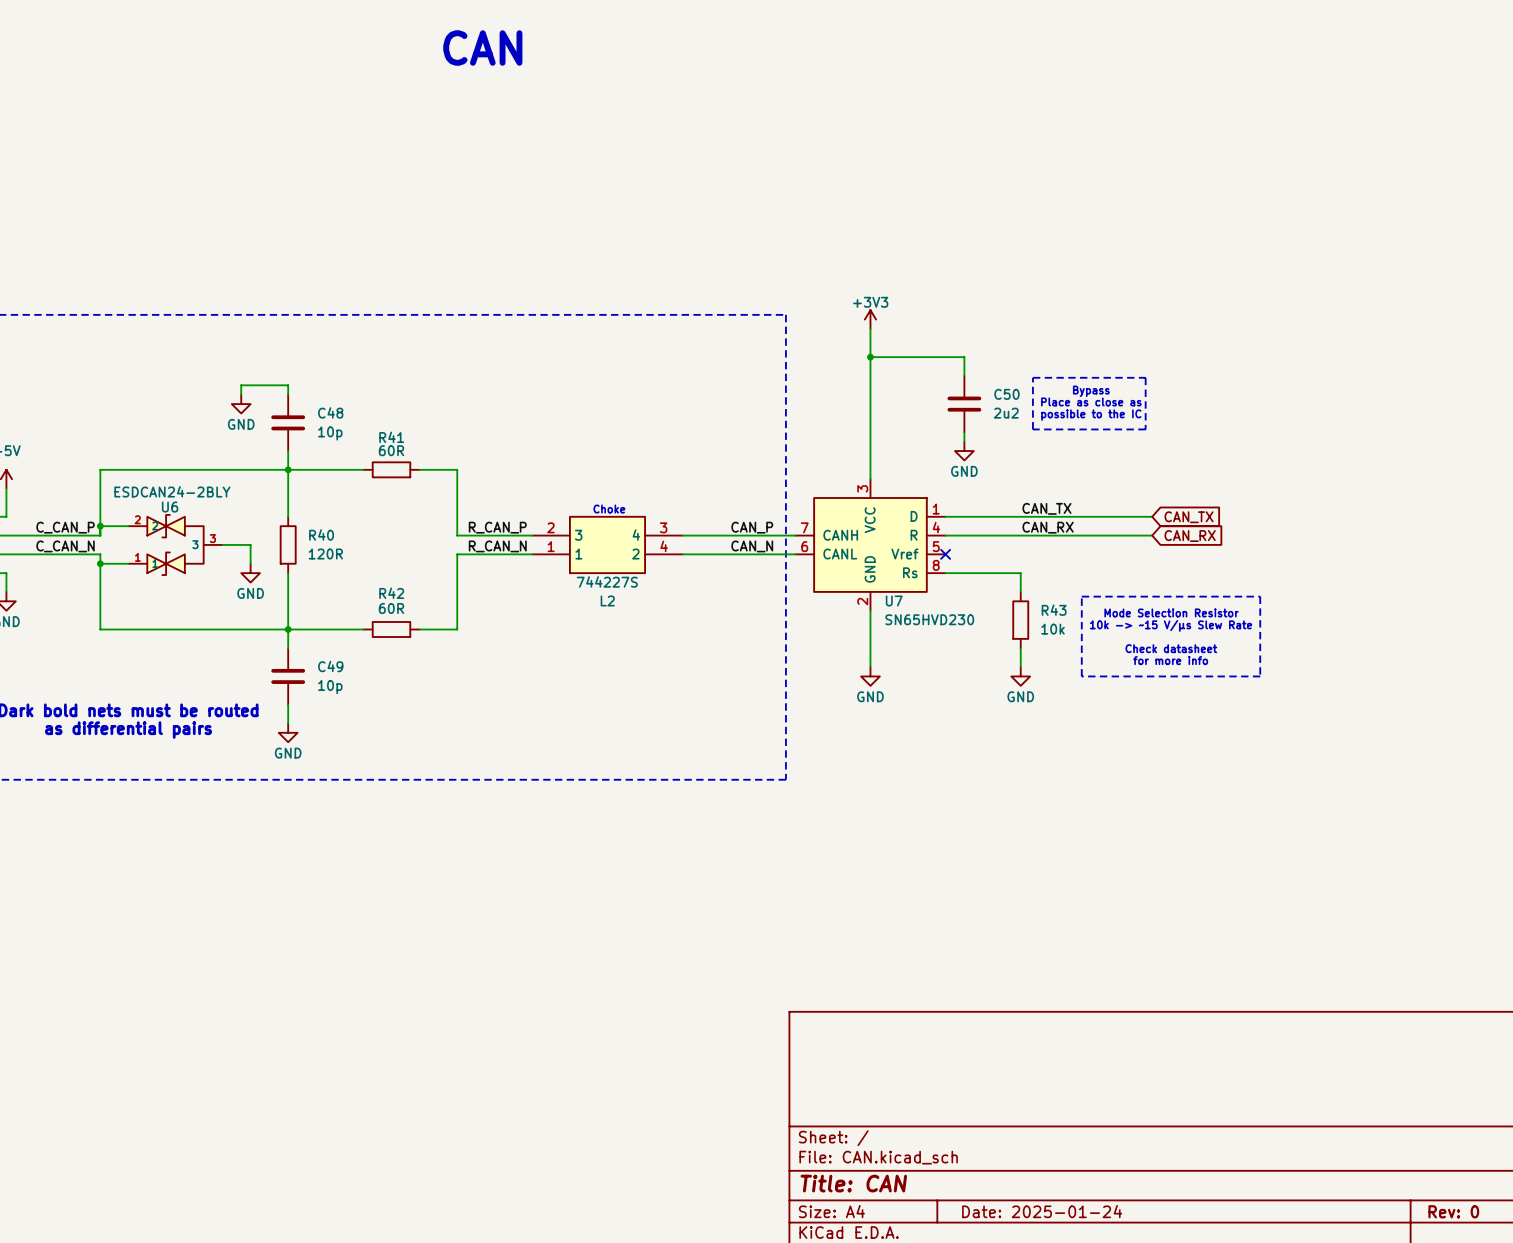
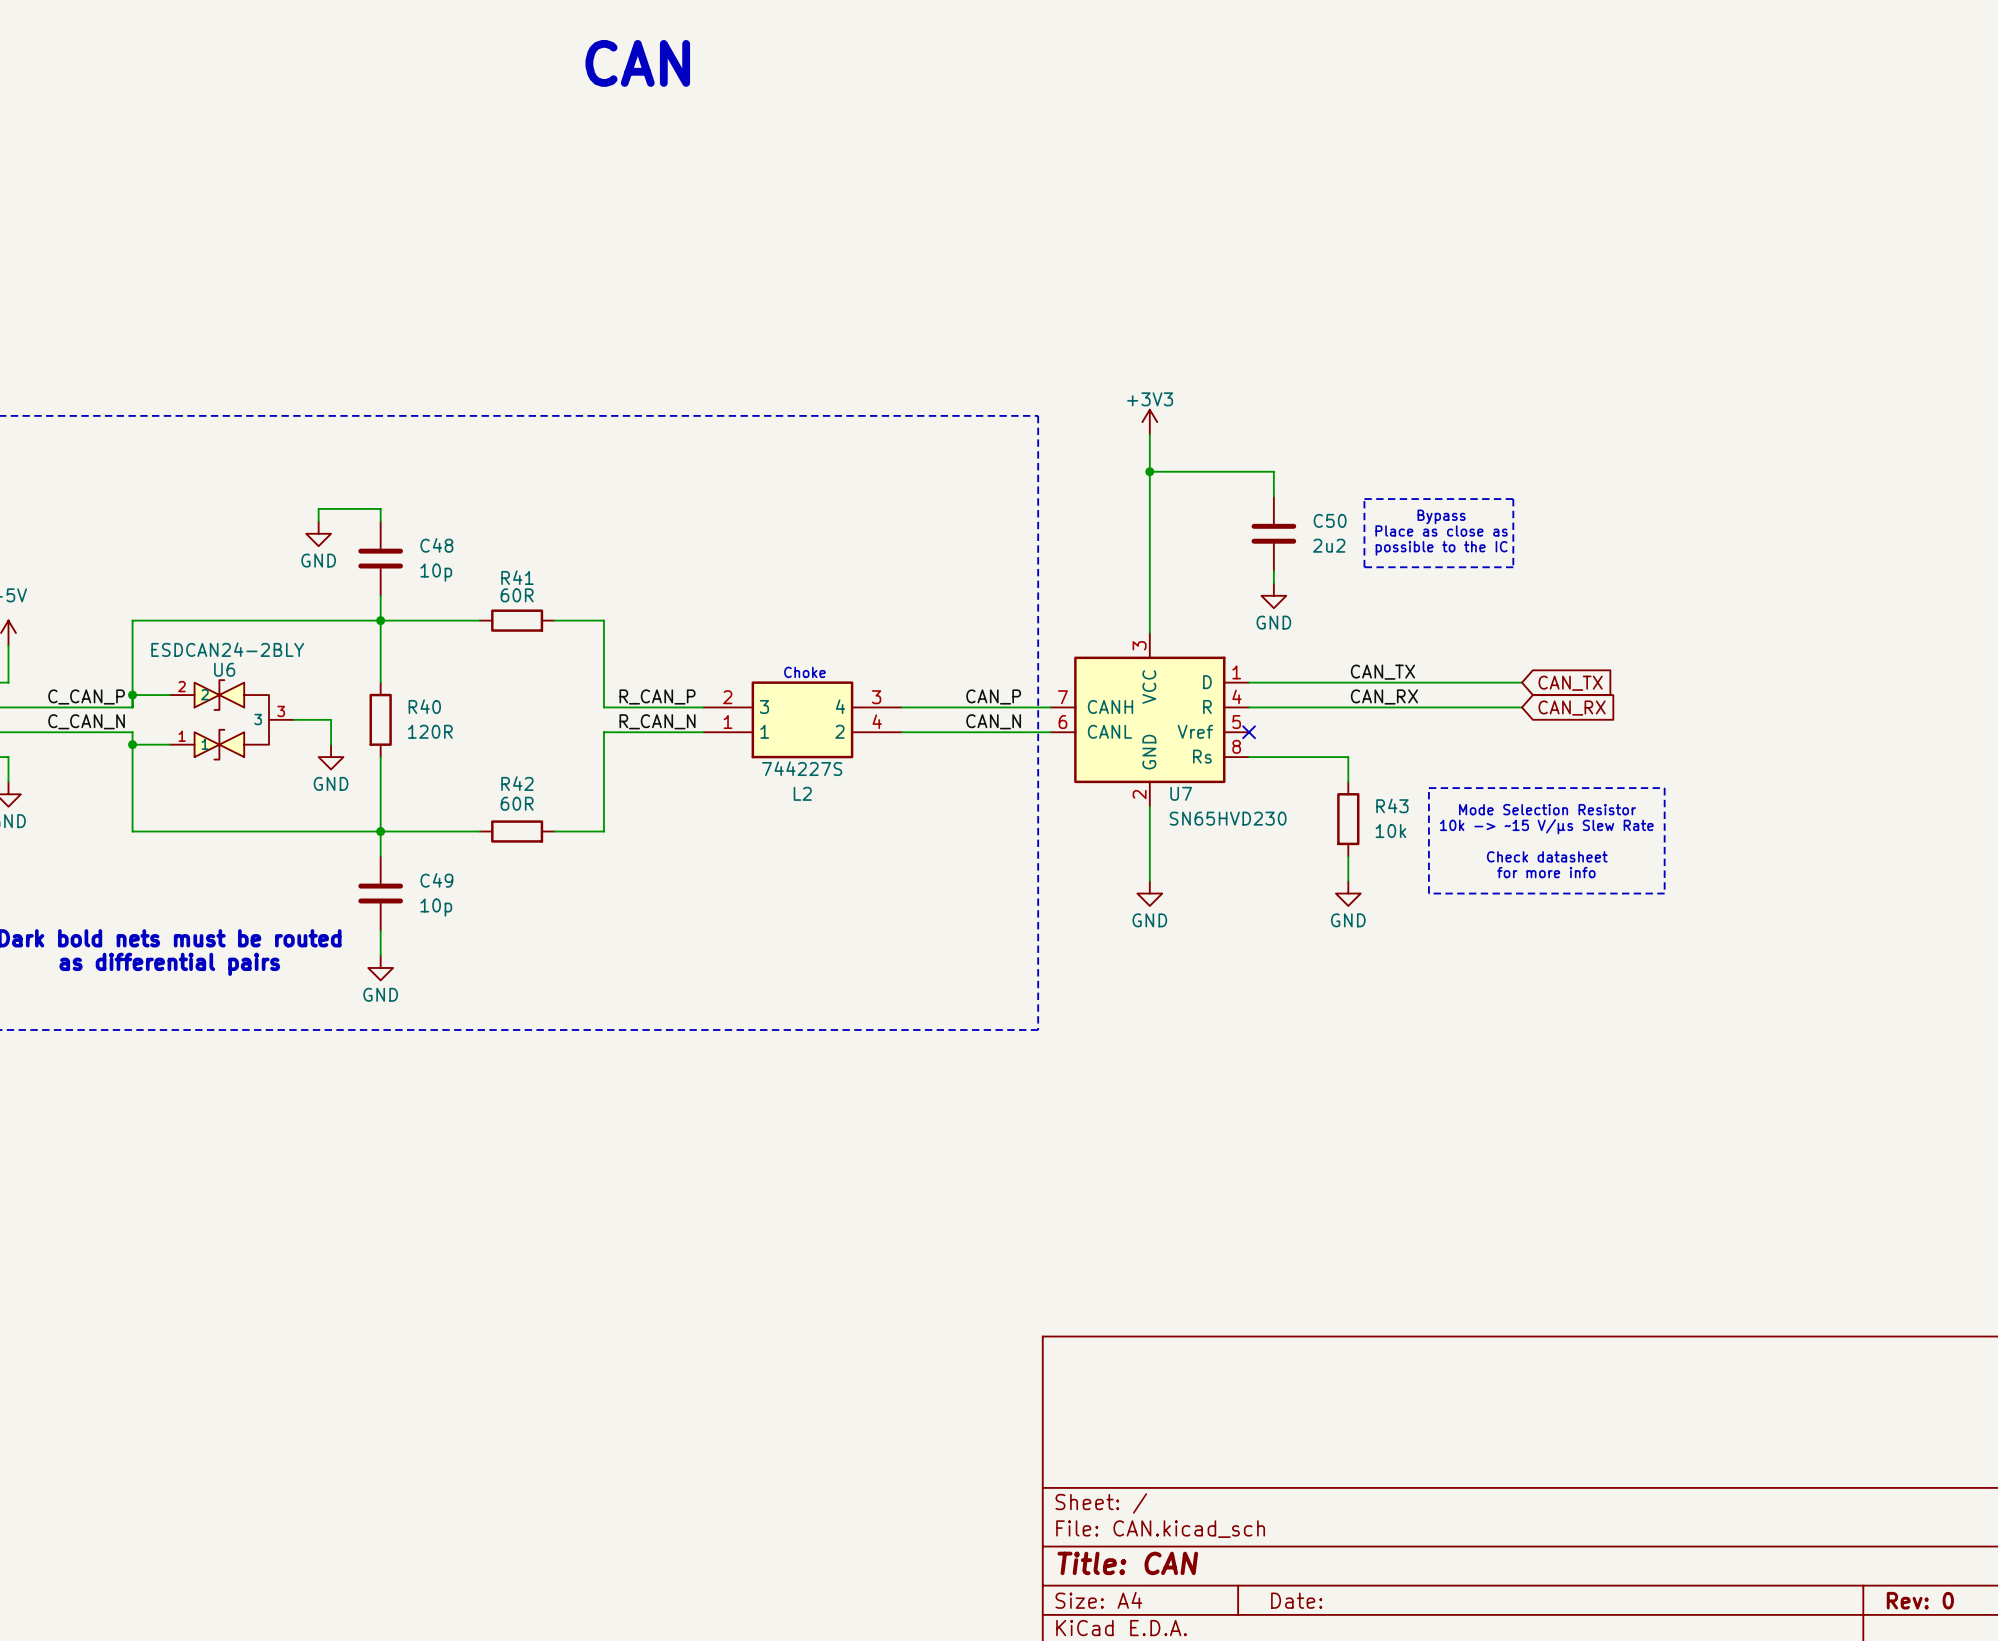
title block: Date: 2025-01-24 (1042, 1211) -> Date: (1296, 1600)

